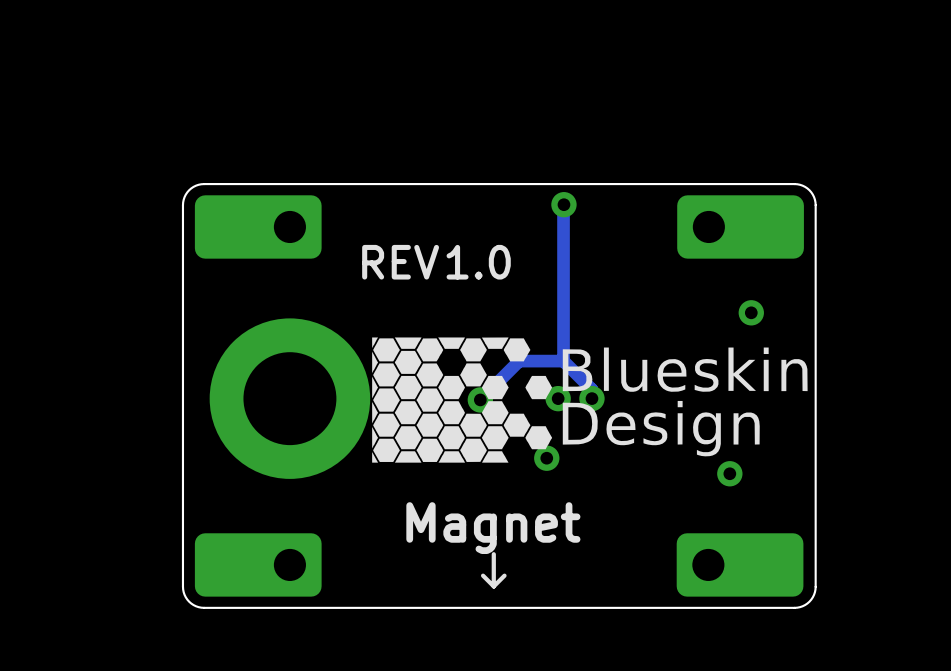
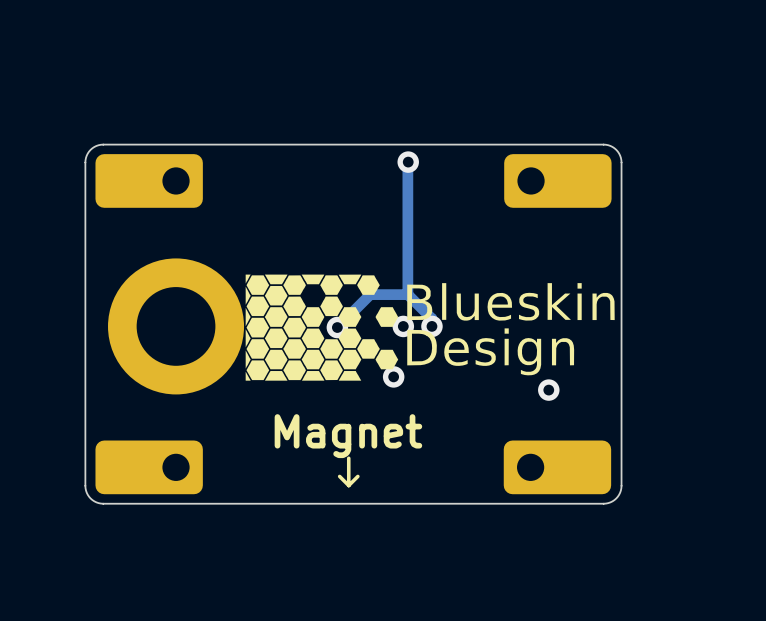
text: REV (400, 262) -> none
text: 1.0 (478, 262) -> none
via: (751, 312) -> none

